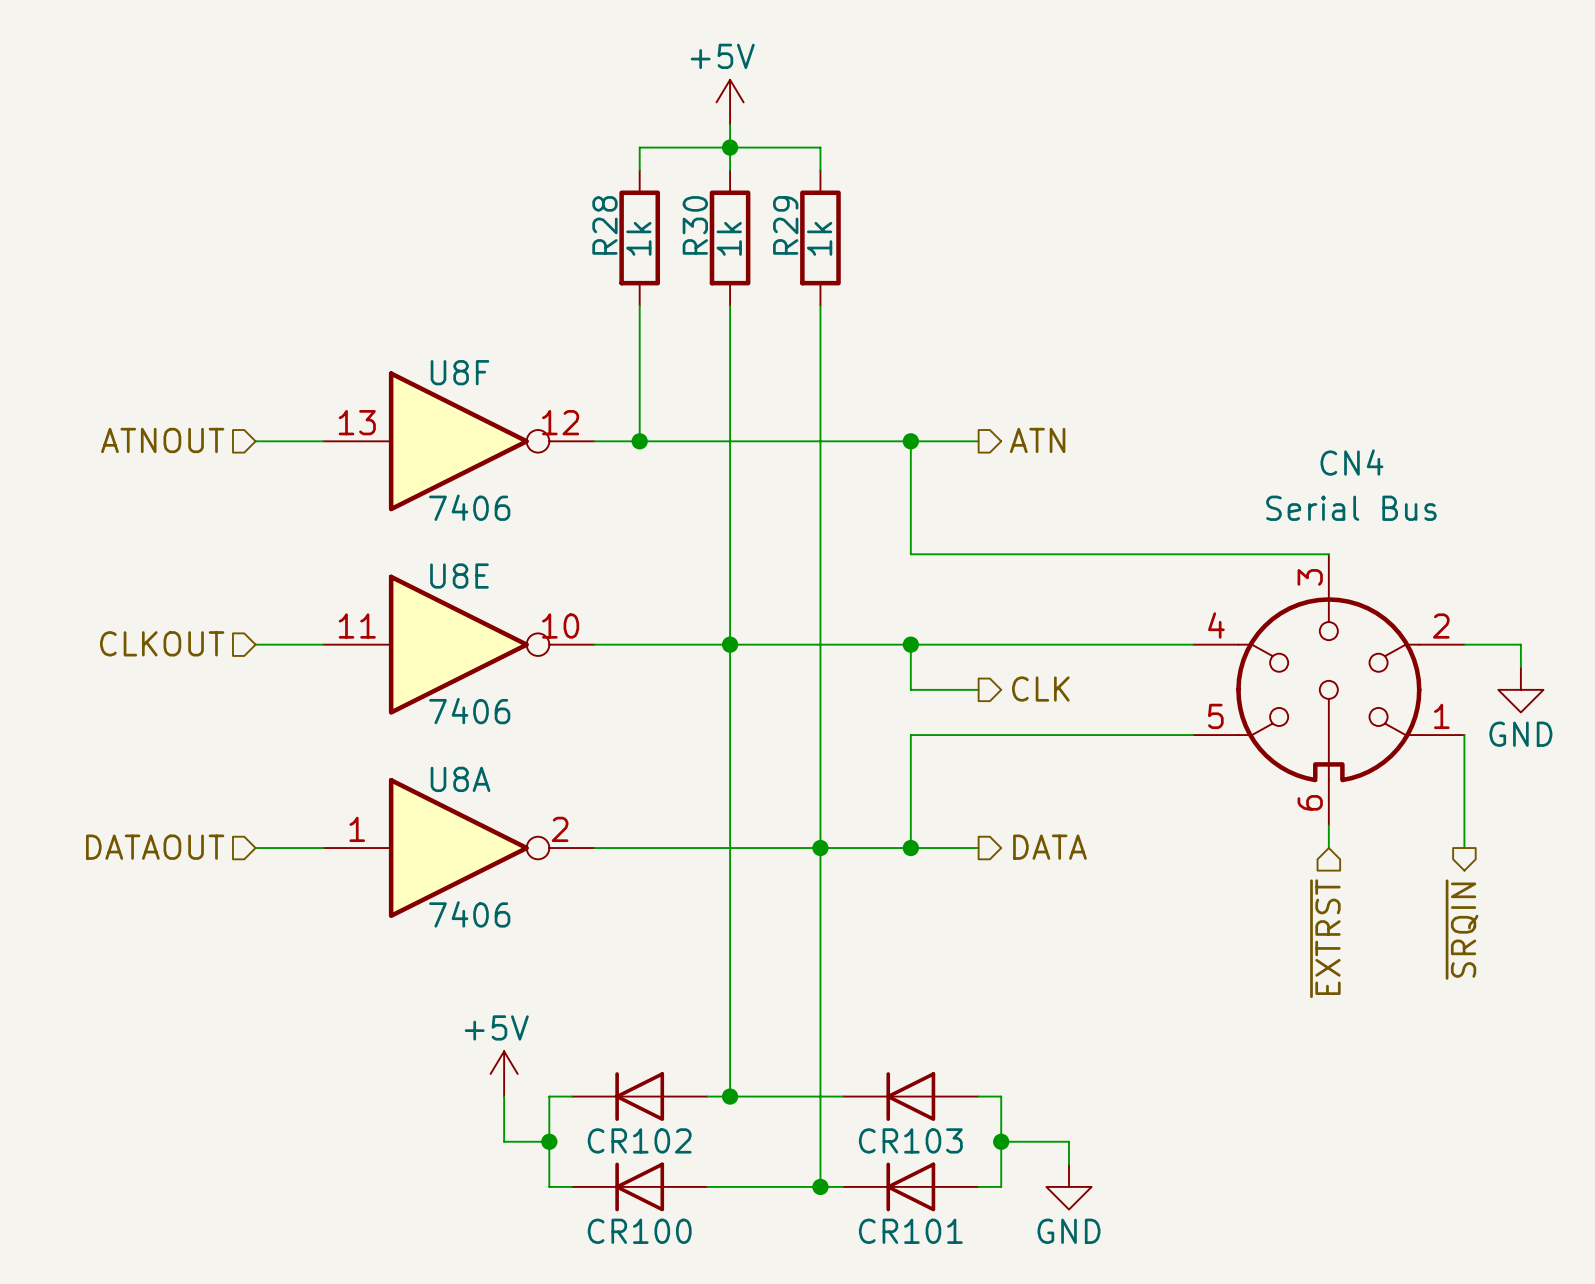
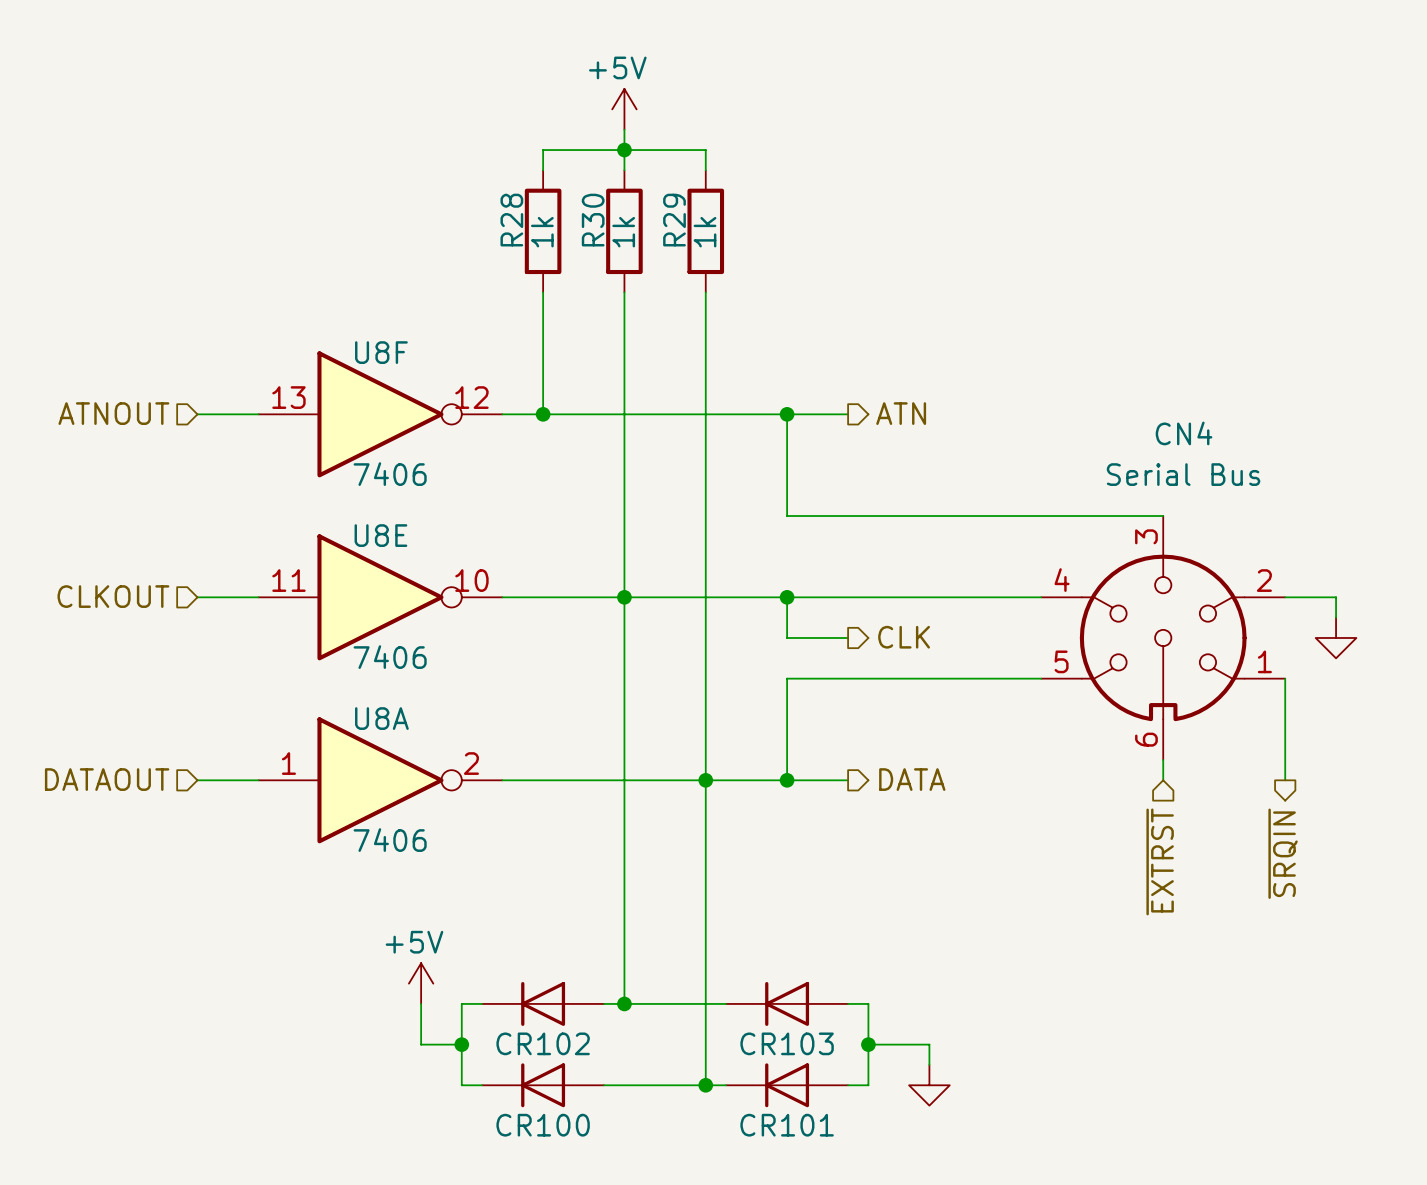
power symbol text: GND (1520, 734) -> none
power symbol text: GND (1069, 1231) -> none

